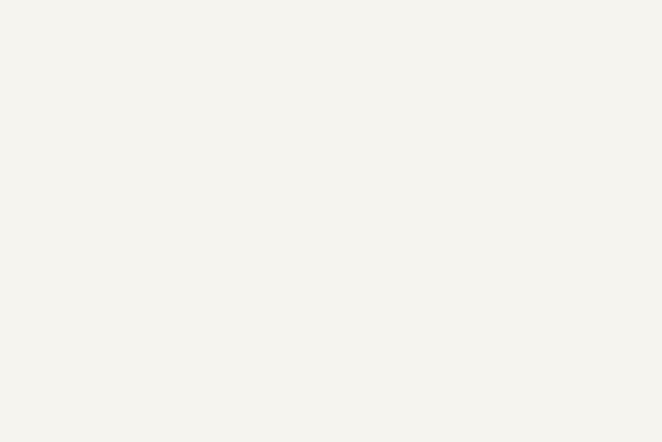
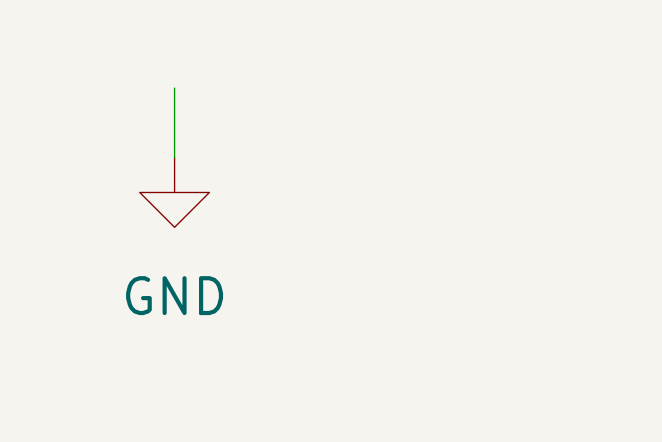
wire: none -> (174, 88) (174, 157)
power symbol: none -> GND (174, 192)

